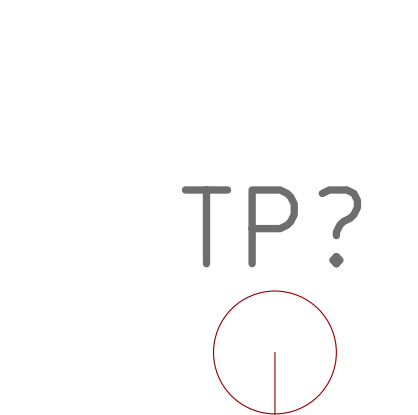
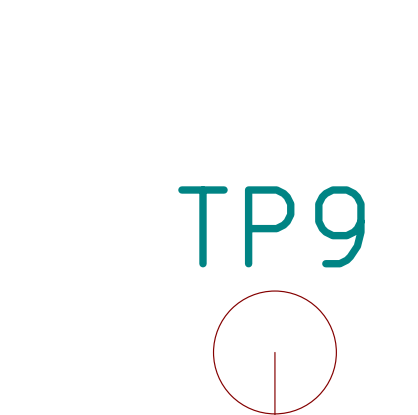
TP? name: TP? (271, 226) -> TP9 (271, 226)

